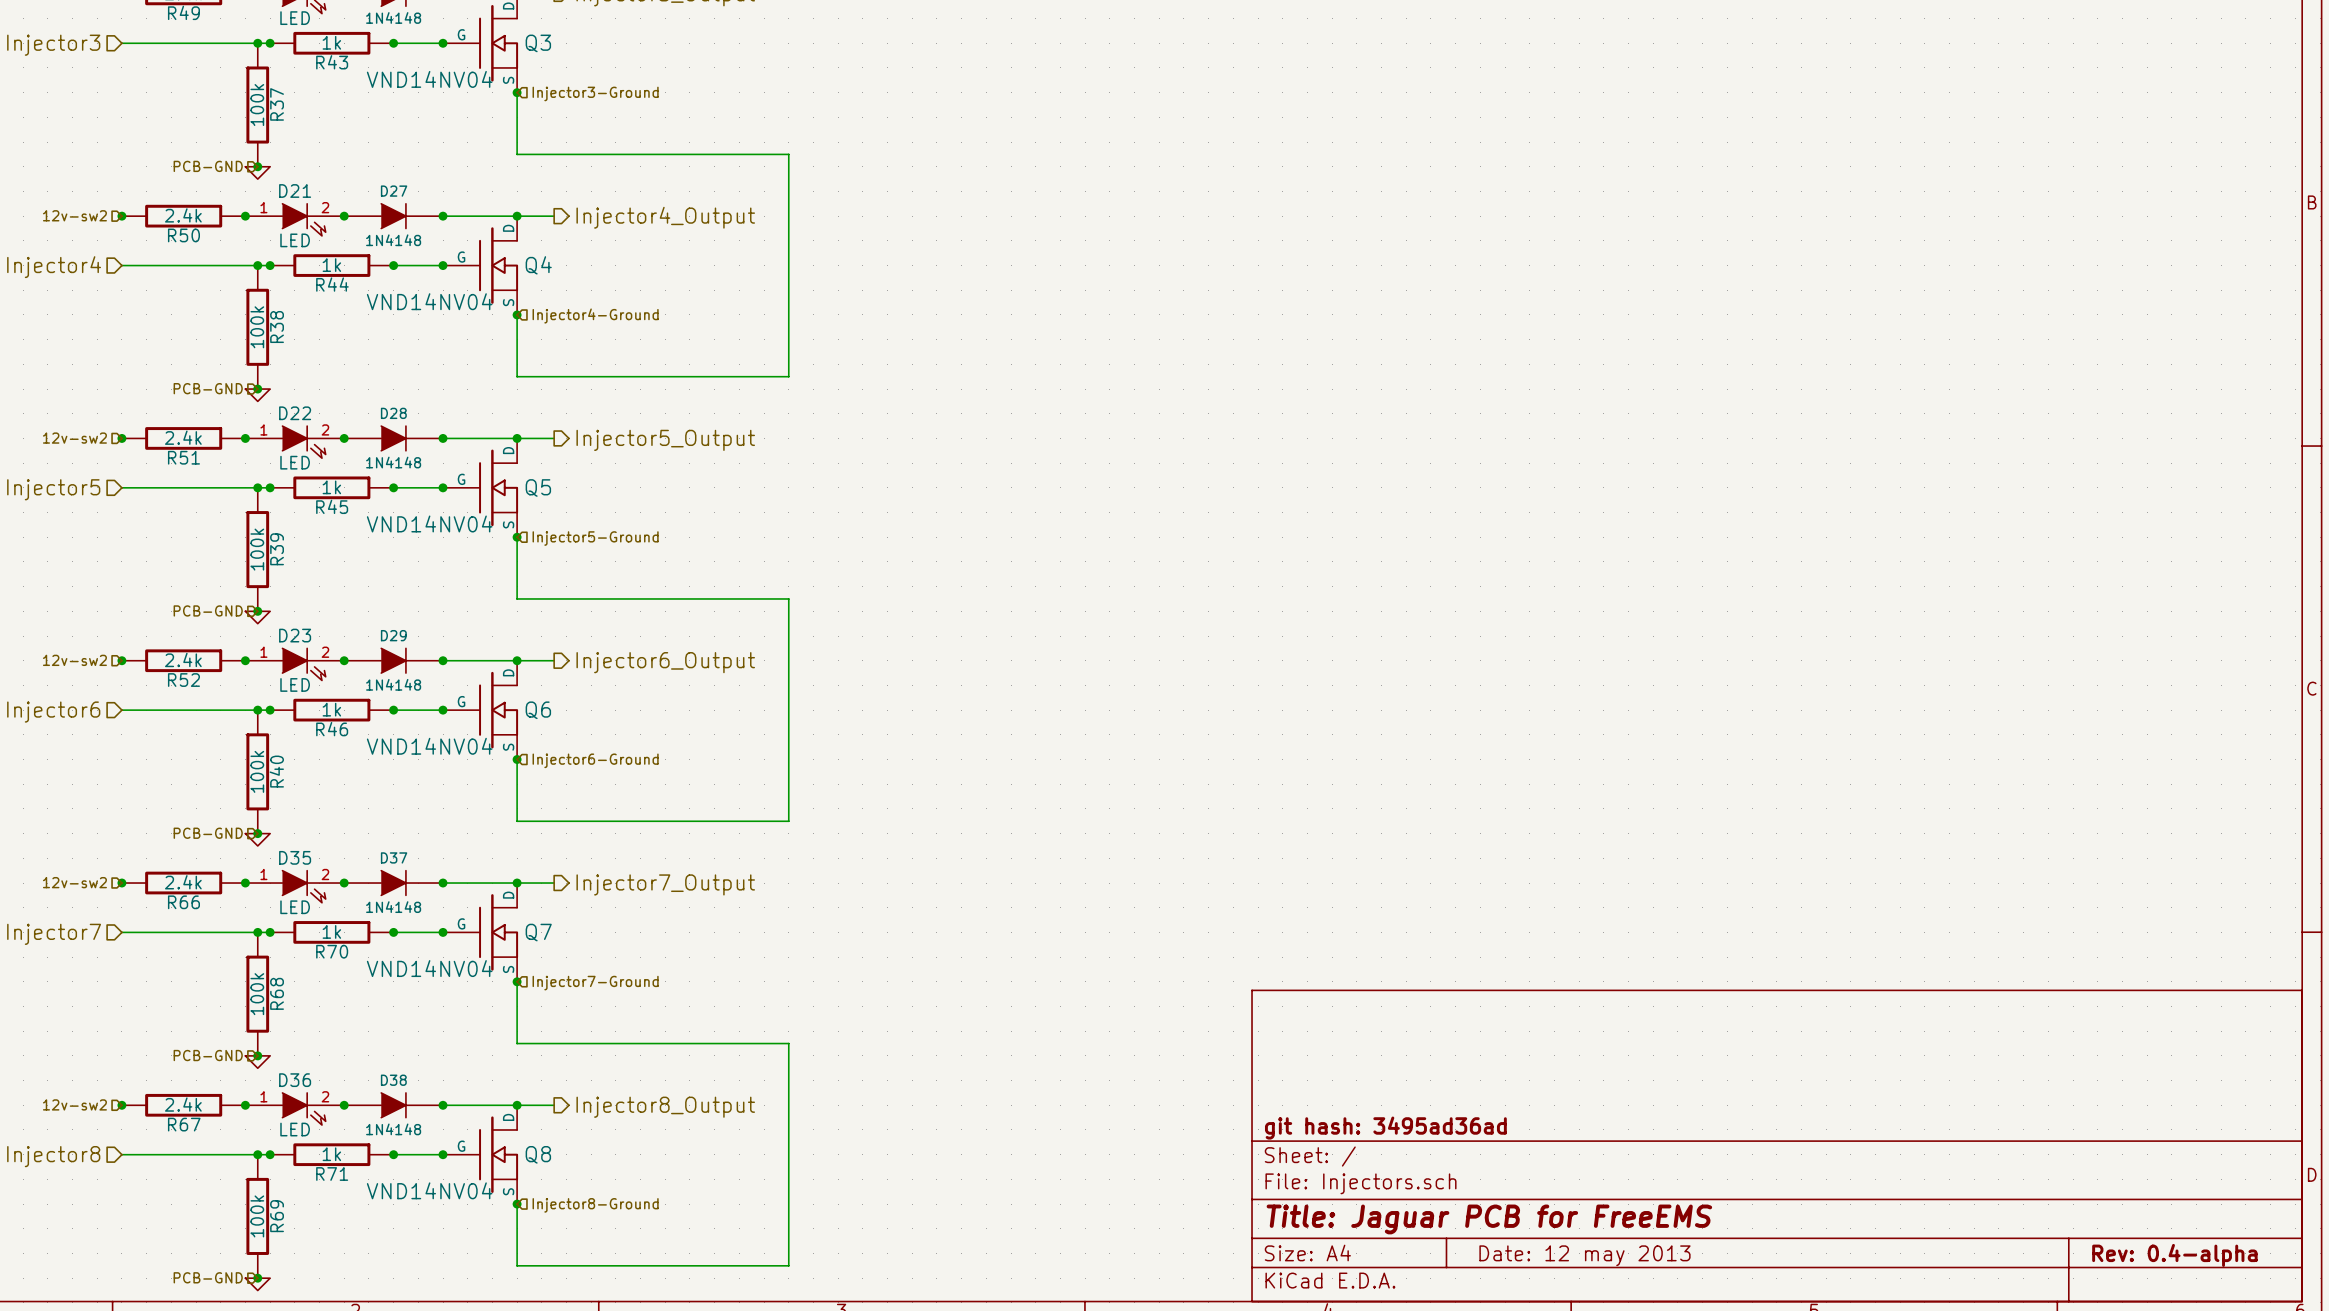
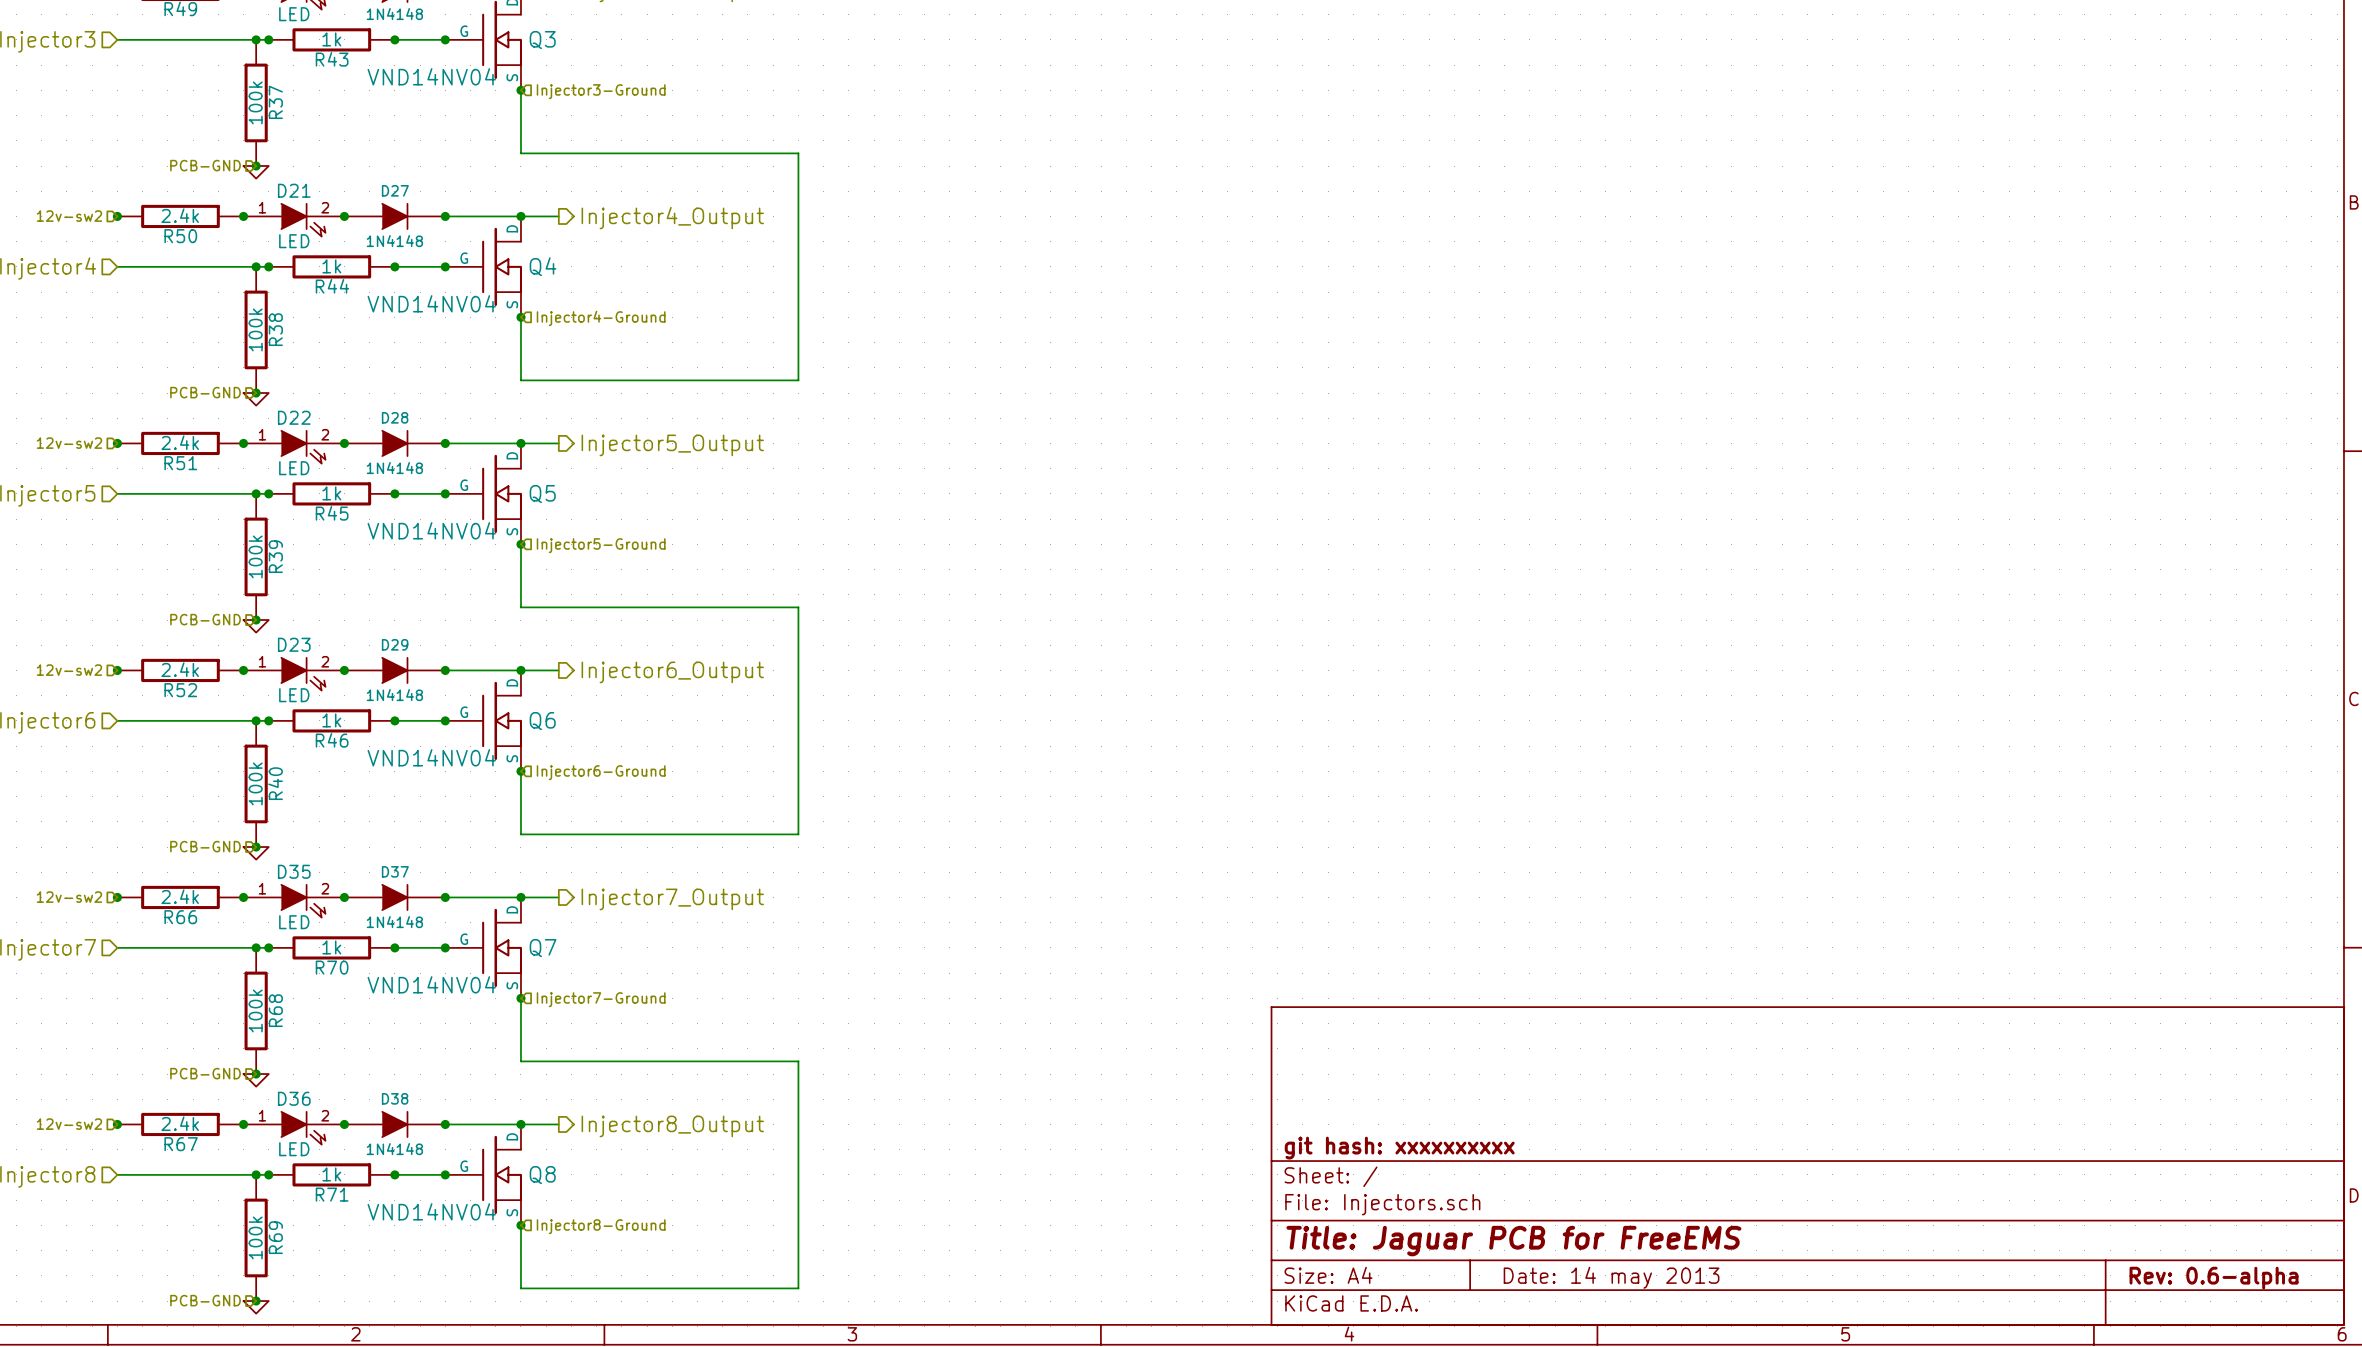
title block: git hash: 3495ad36ad (1385, 1128) -> git hash: xxxxxxxxxx (1399, 1148)
title block: Date: 12 may 2013 (1584, 1255) -> Date: 14 may 2013 (1611, 1277)
title block: Rev: 0.4-alpha (2174, 1255) -> Rev: 0.6-alpha (2214, 1278)

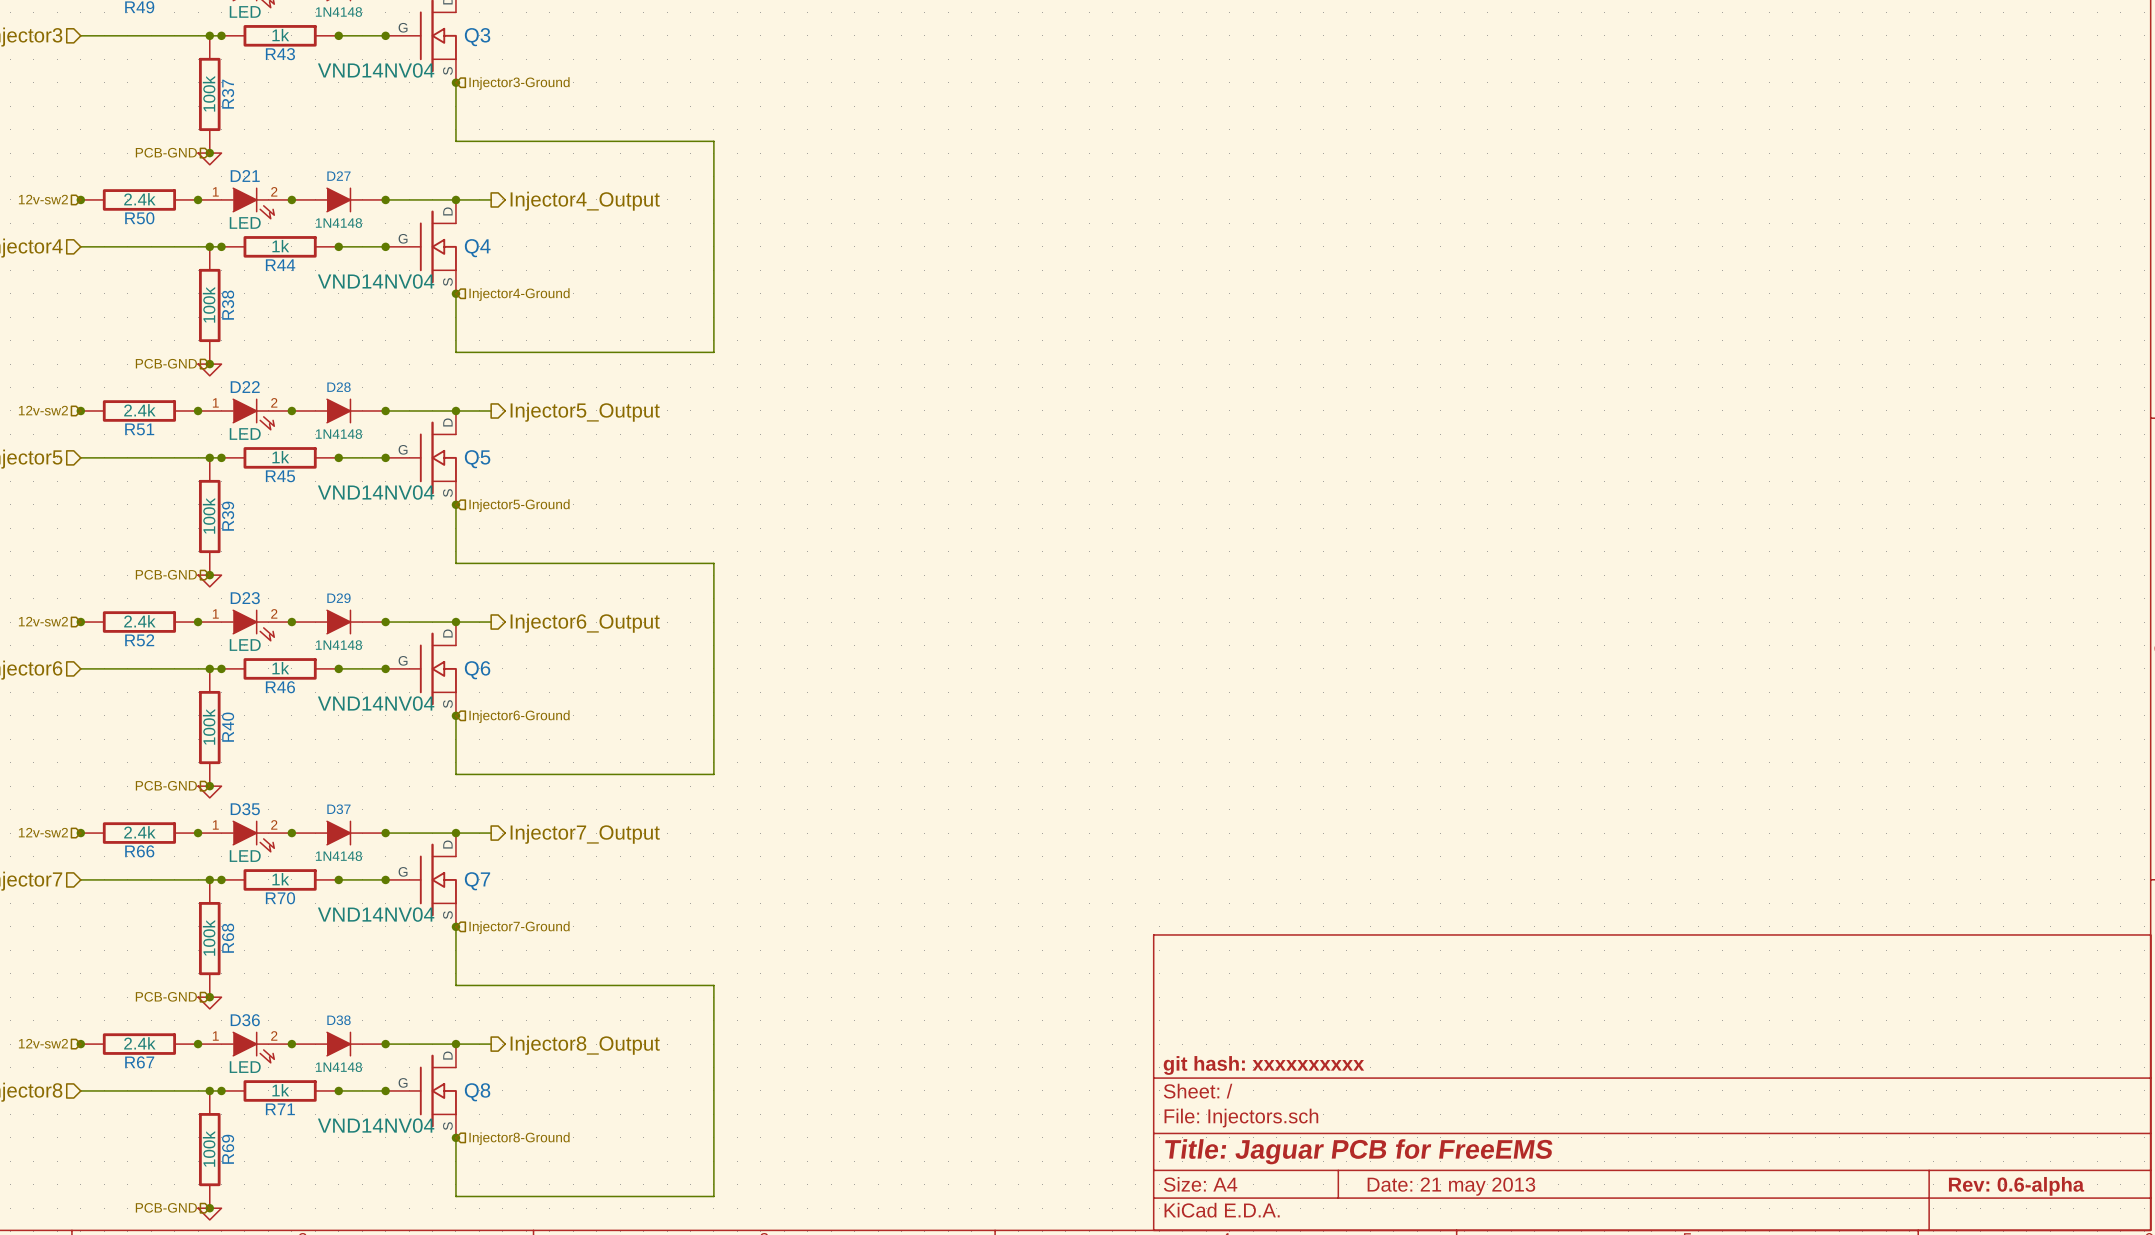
title block: Date: 14 may 2013 (1611, 1277) -> Date: 21 may 2013 (1451, 1186)

